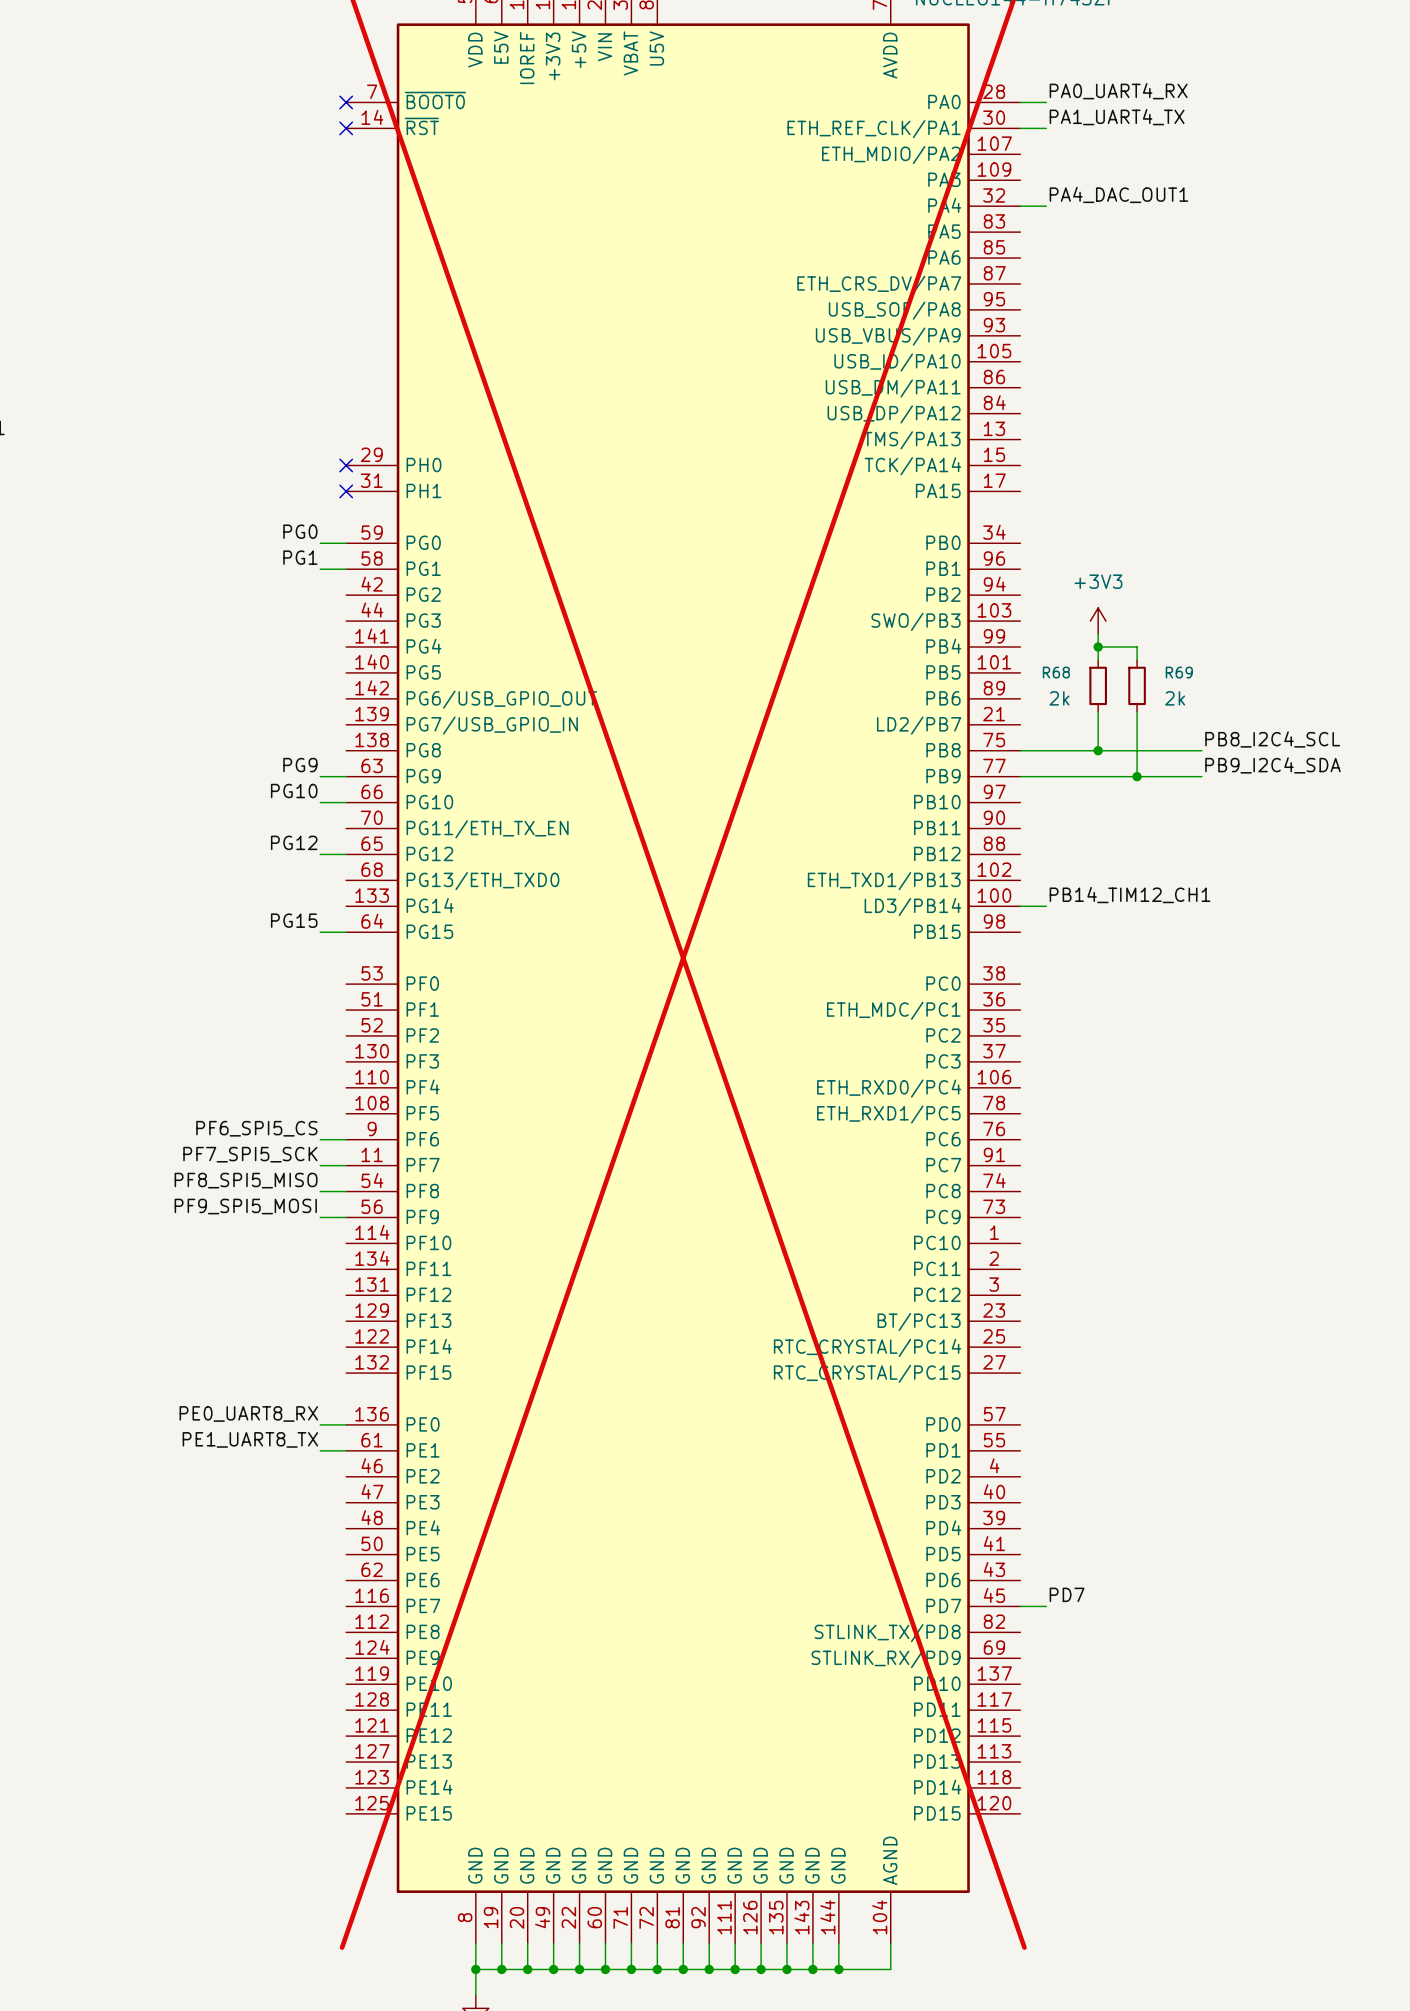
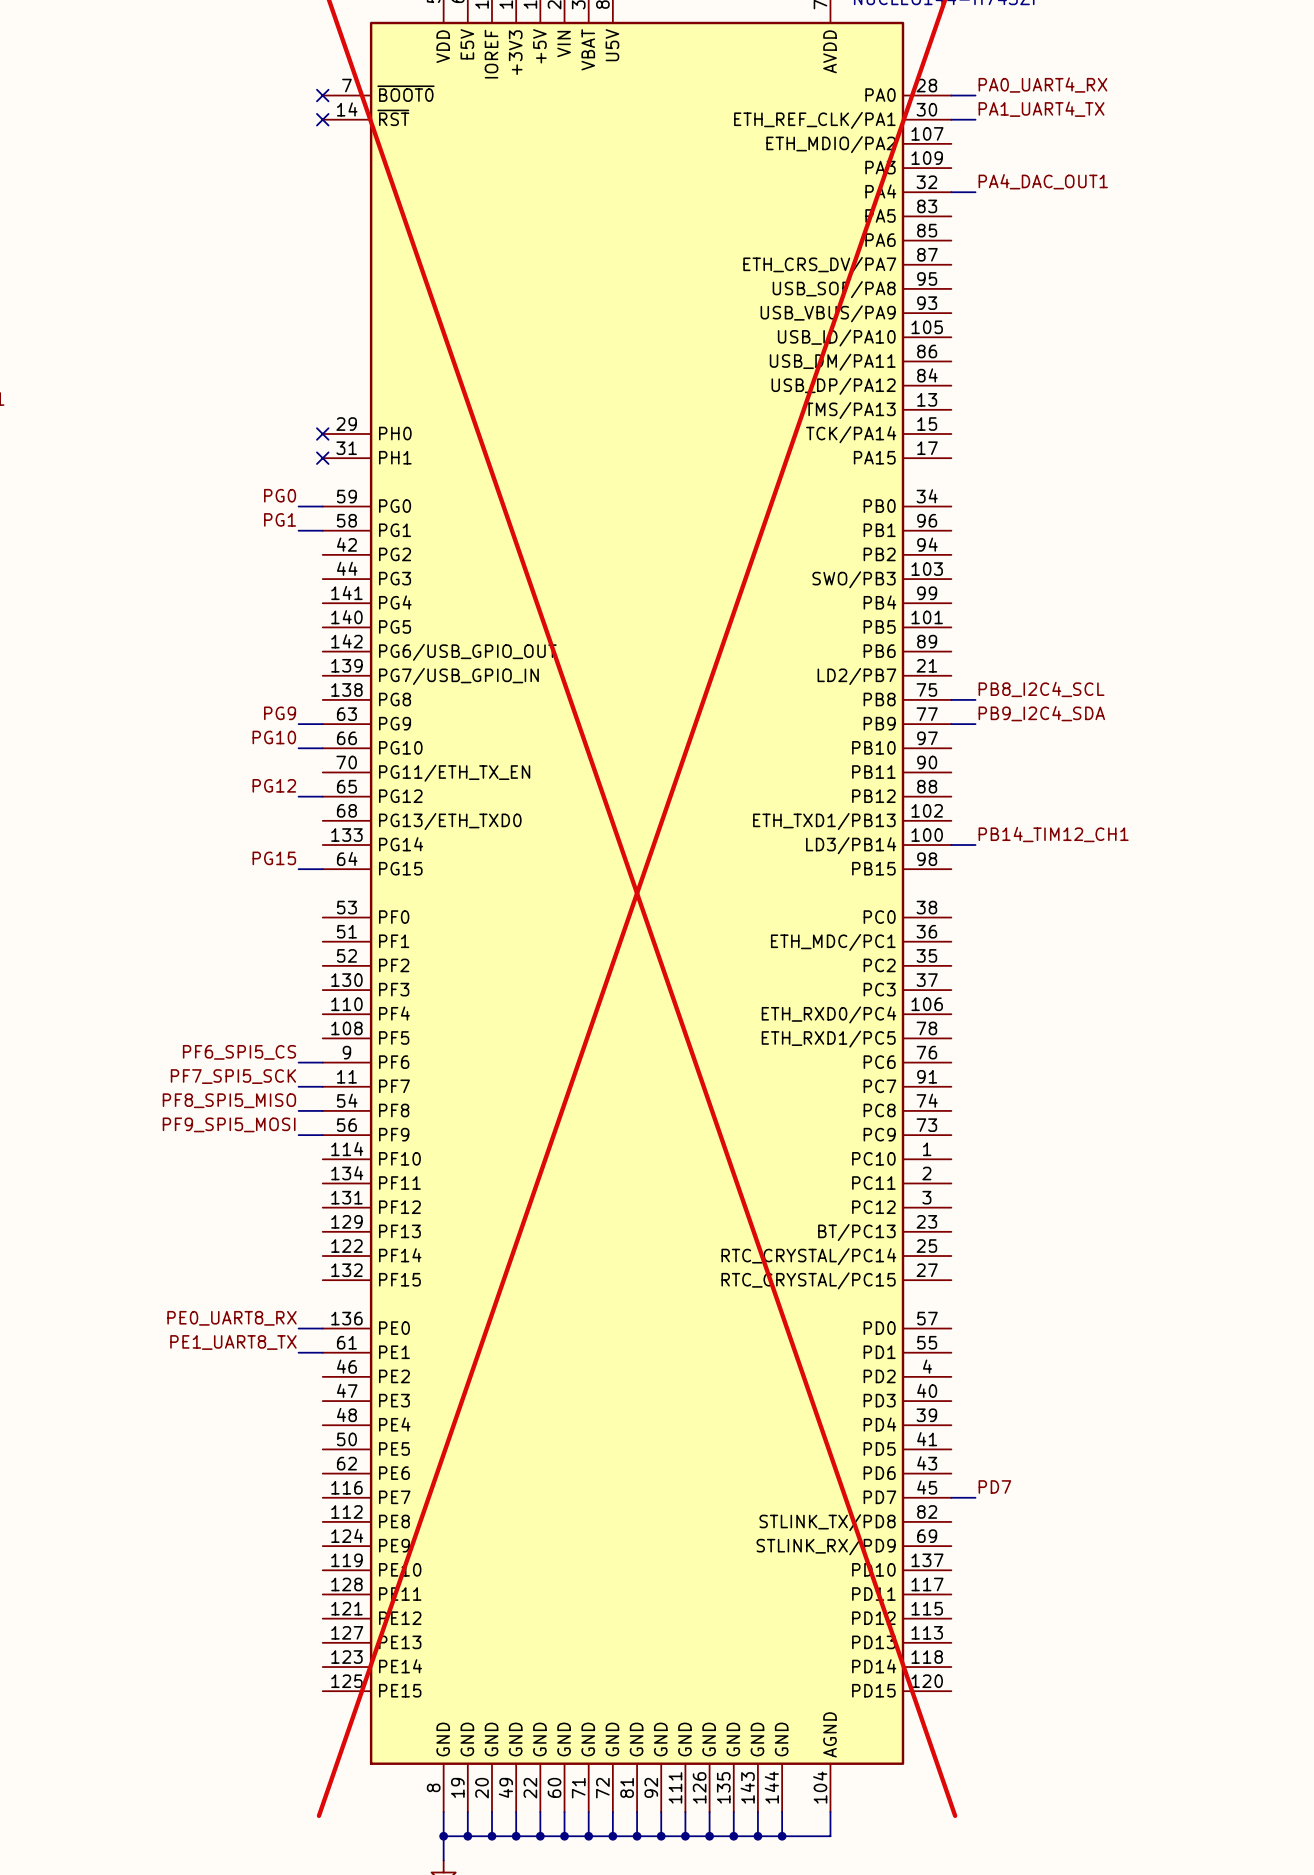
power symbol: +3V3 (1098, 621) -> none
wire: (1098, 634) (1098, 659) -> none
wire: (1098, 647) (1137, 647) (1137, 659) -> none
junction: (1098, 647) -> none
R68: 2k (1098, 685) -> none
R69: 2k (1137, 685) -> none
wire: (1098, 711) (1098, 750) -> none
wire: (1137, 711) (1137, 776) -> none
label position: PB8_I2C4_SCL (1272, 739) -> PB8_I2C4_SCL (1041, 689)
wire: (1046, 750) (1201, 750) -> none
junction: (1098, 750) -> none
label position: PB9_I2C4_SDA (1272, 765) -> PB9_I2C4_SDA (1041, 713)
wire: (1046, 776) (1201, 776) -> none
junction: (1137, 776) -> none

